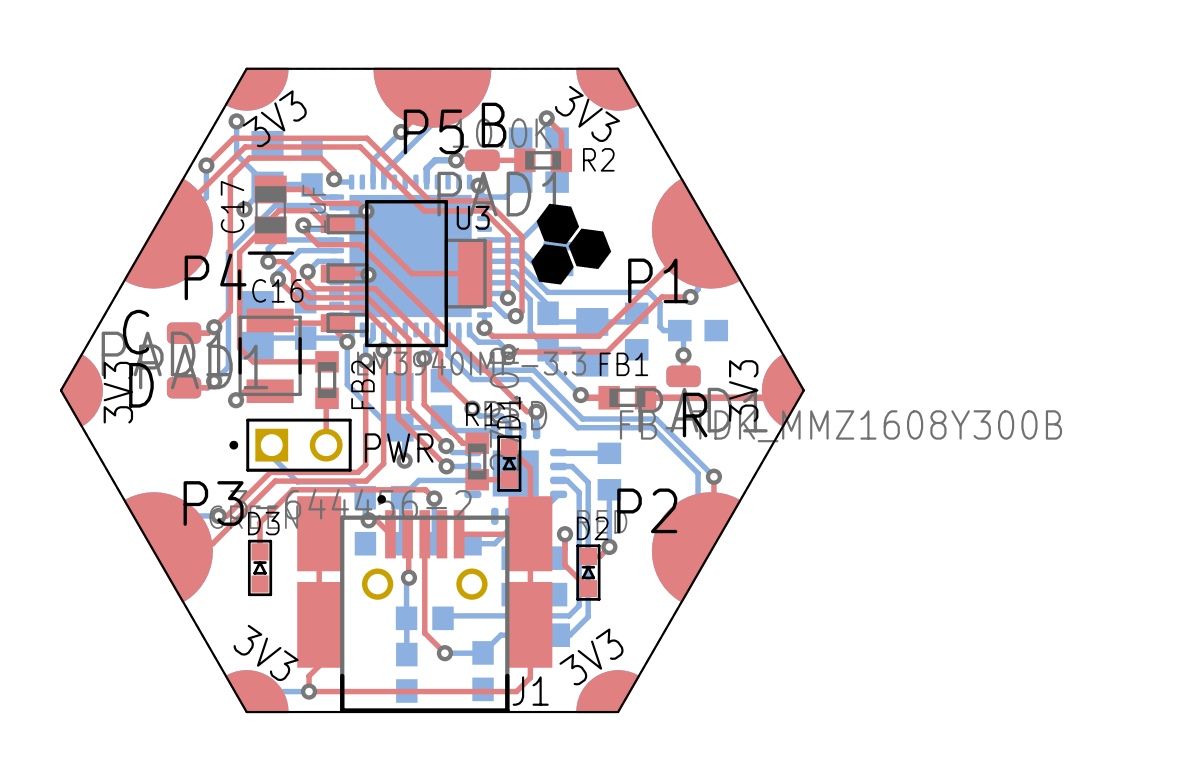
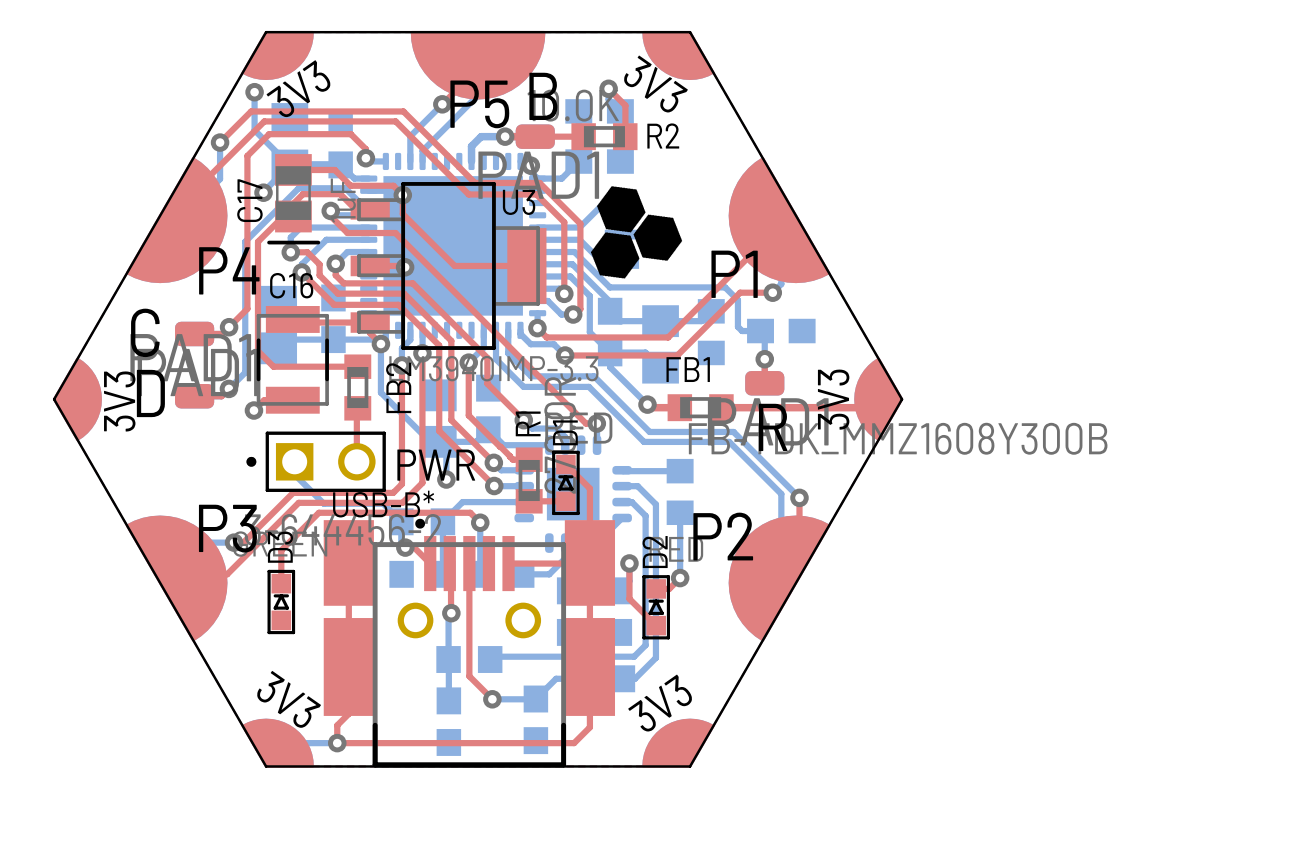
R1 name rotation: 0° (481, 414) -> 90° counterclockwise (528, 423)
D3 name rotation: 0° (263, 523) -> 90° counterclockwise (280, 547)
D2 name rotation: 0° (592, 528) -> 90° counterclockwise (655, 552)
J1 name: J1 (530, 691) -> USB-B* (383, 504)

